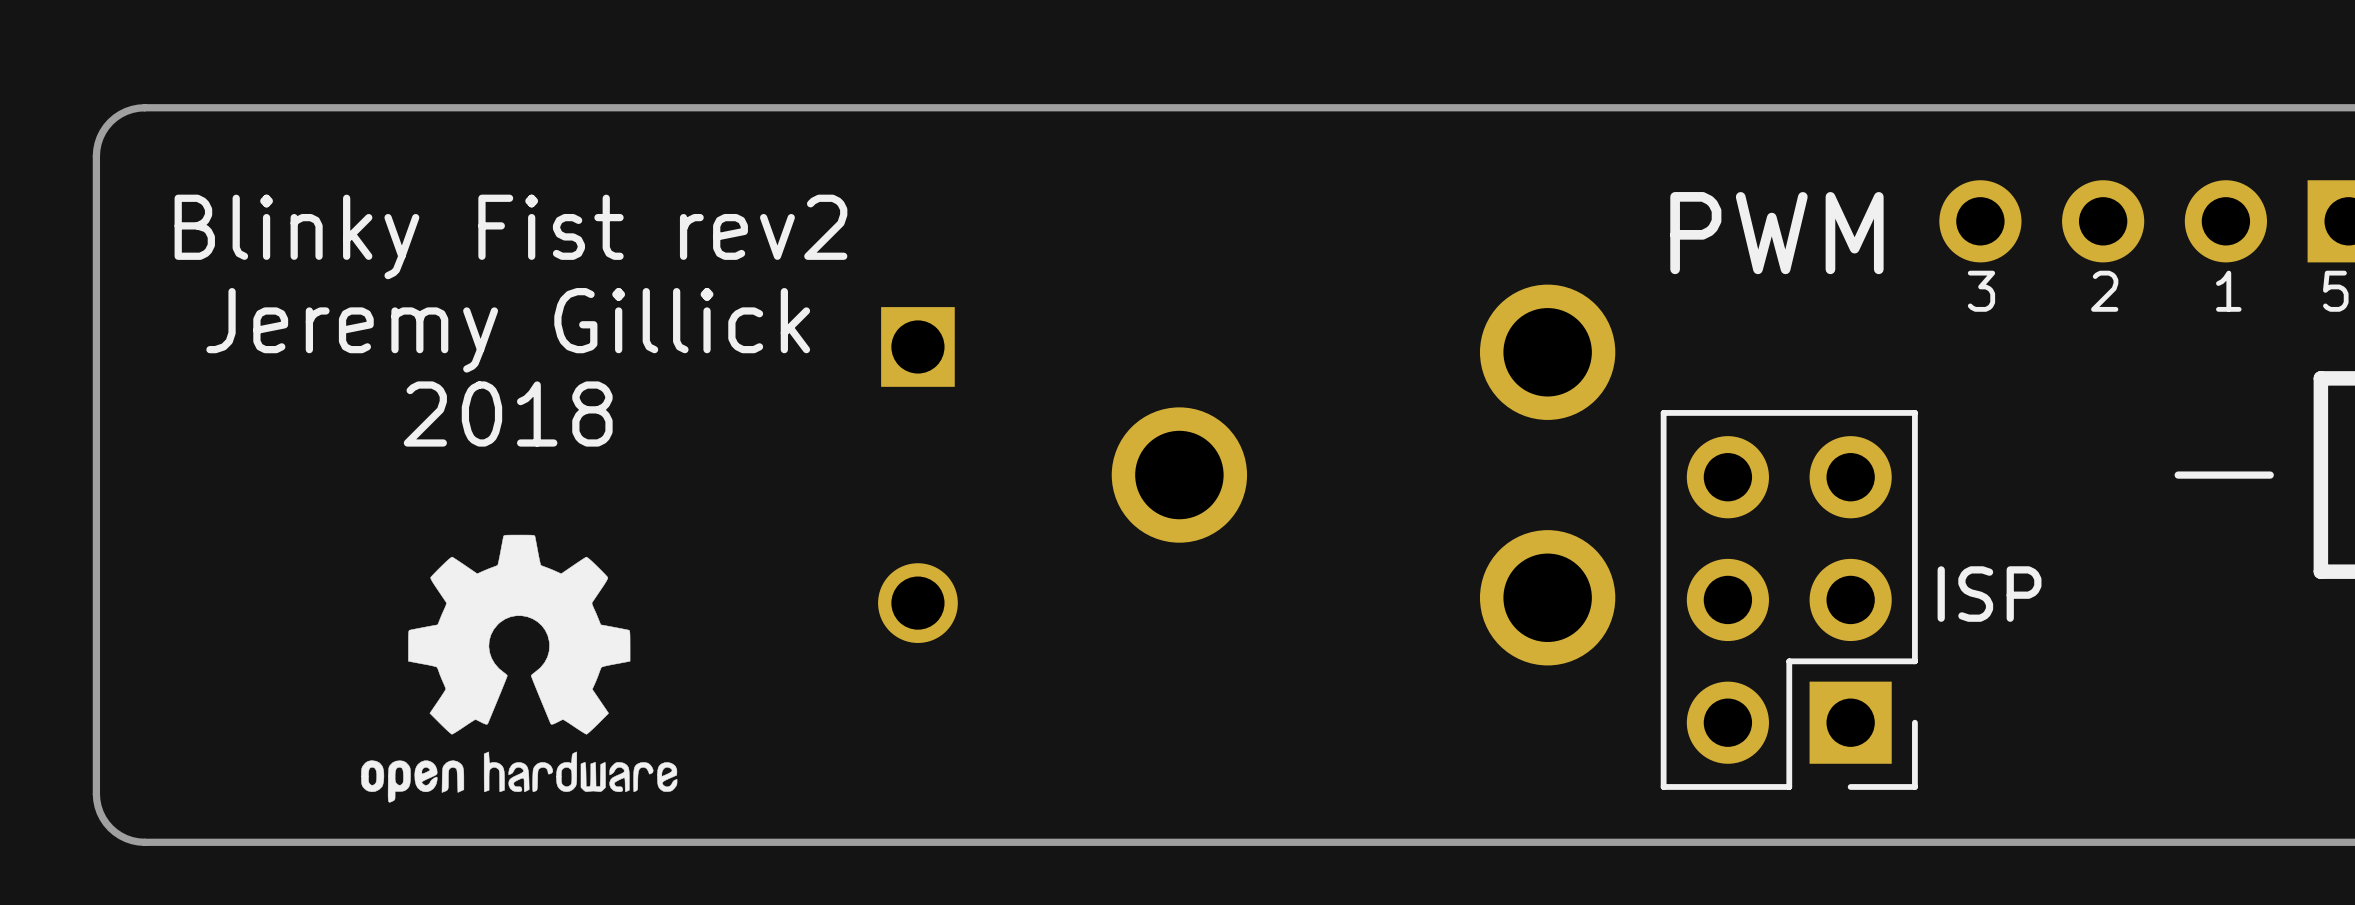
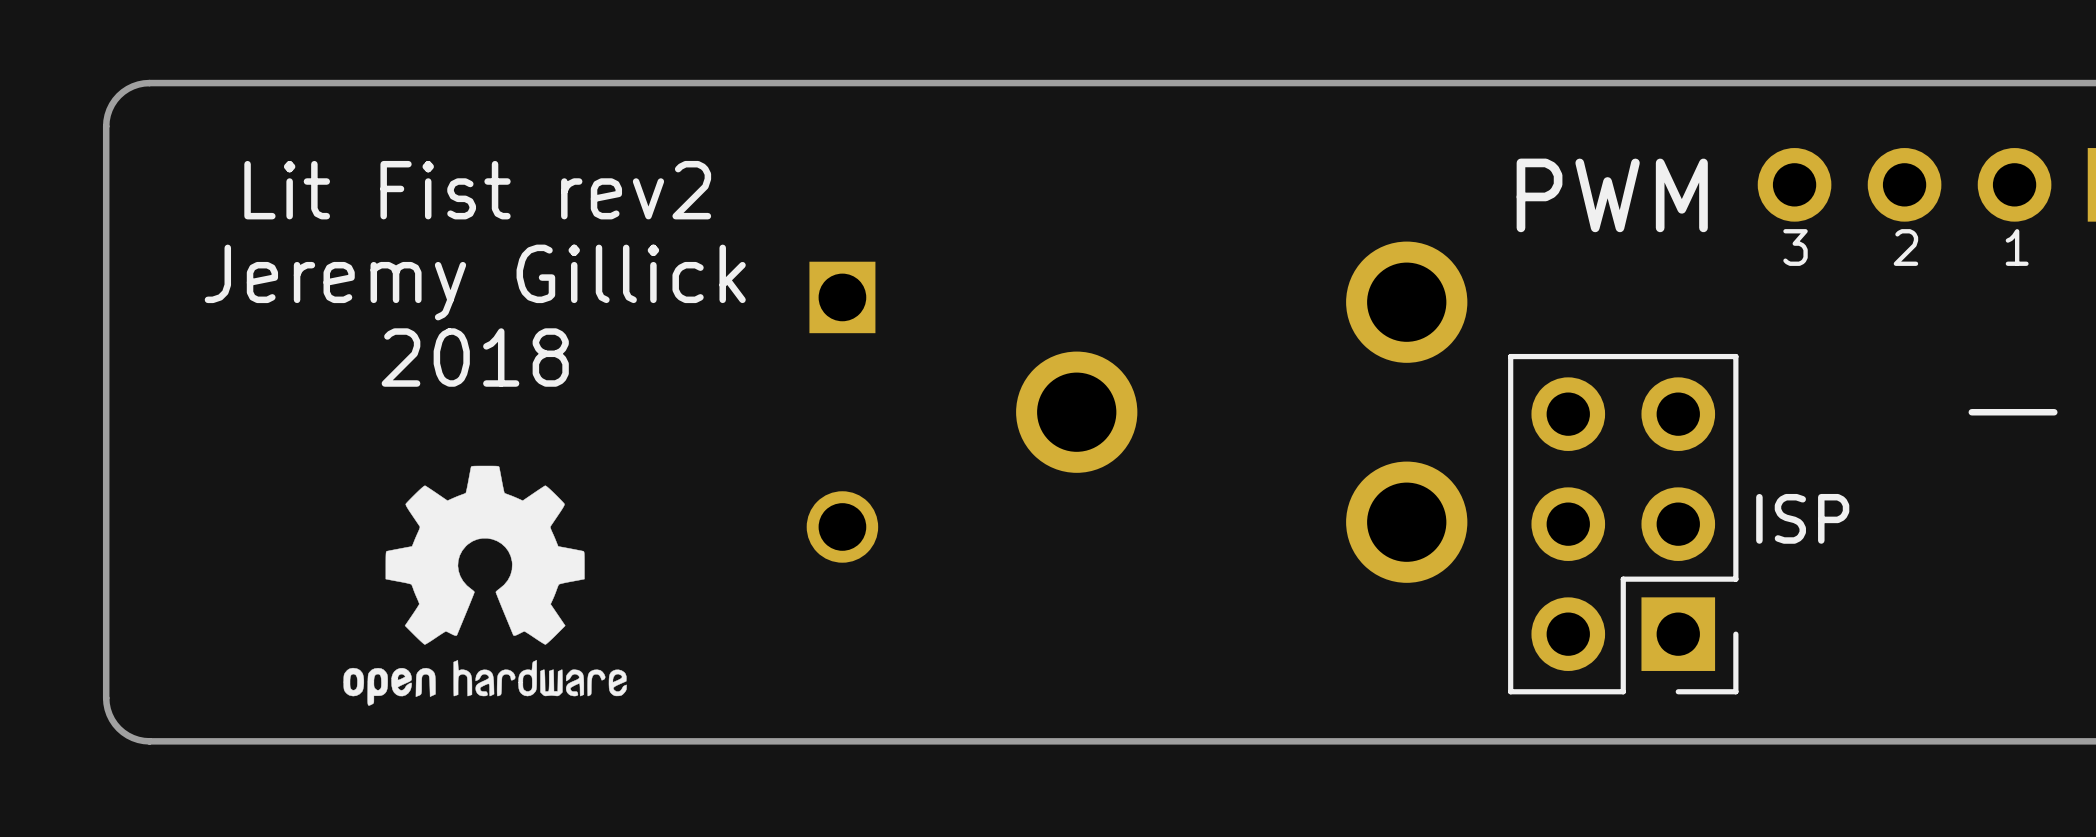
text: Blinky Fist rev2 (510, 236) -> Lit Fist rev2 (477, 190)

